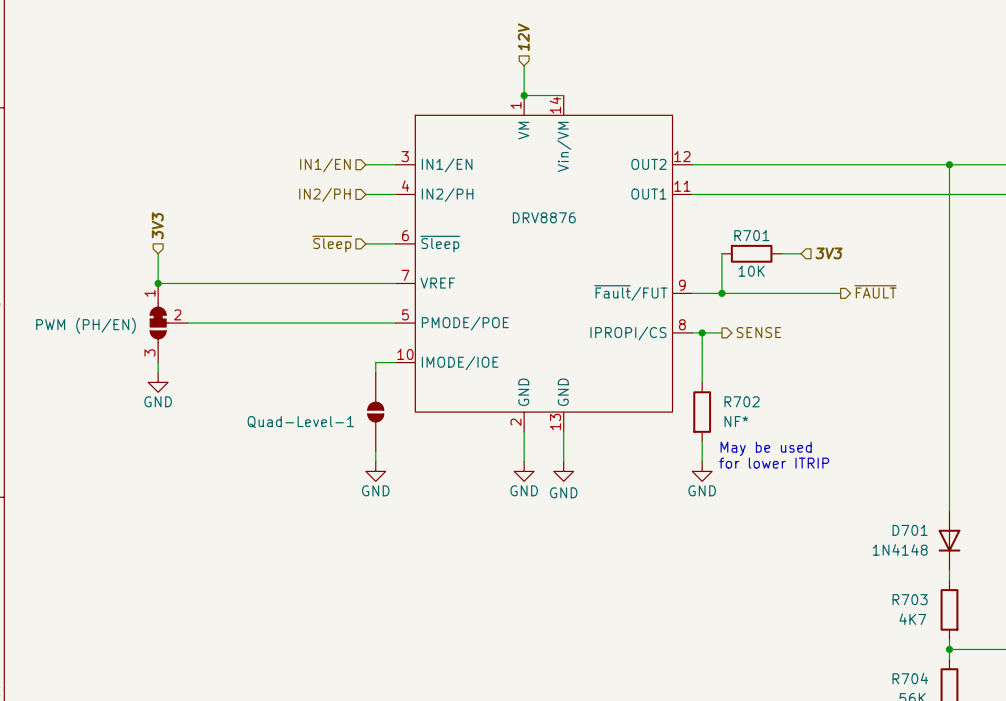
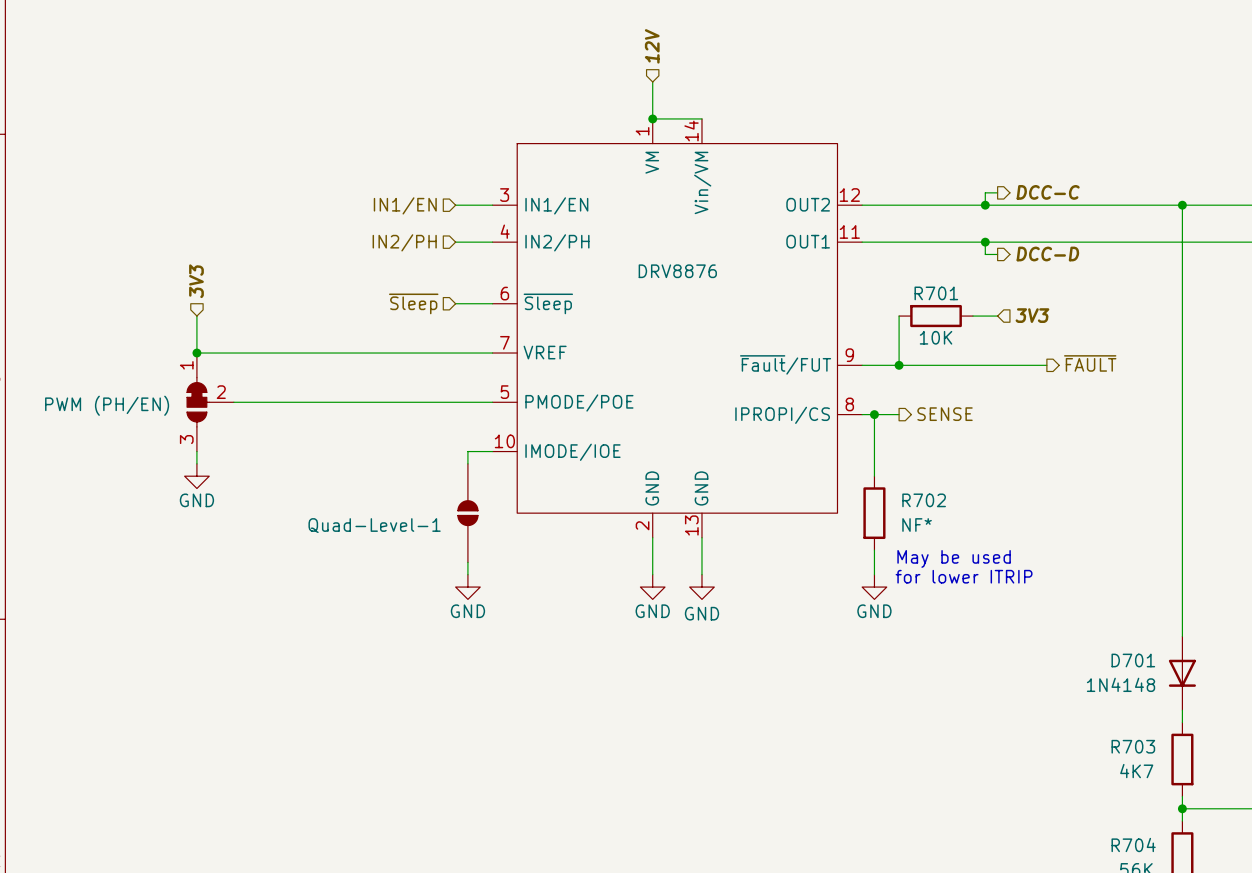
wire: none -> (997, 192) (985, 192) (985, 205)
hierarchical label: none -> DCC-C (1048, 192)
junction: none -> (985, 205)
wire: none -> (985, 242) (985, 254) (997, 254)
junction: none -> (985, 242)
hierarchical label: none -> DCC-D (1047, 254)

